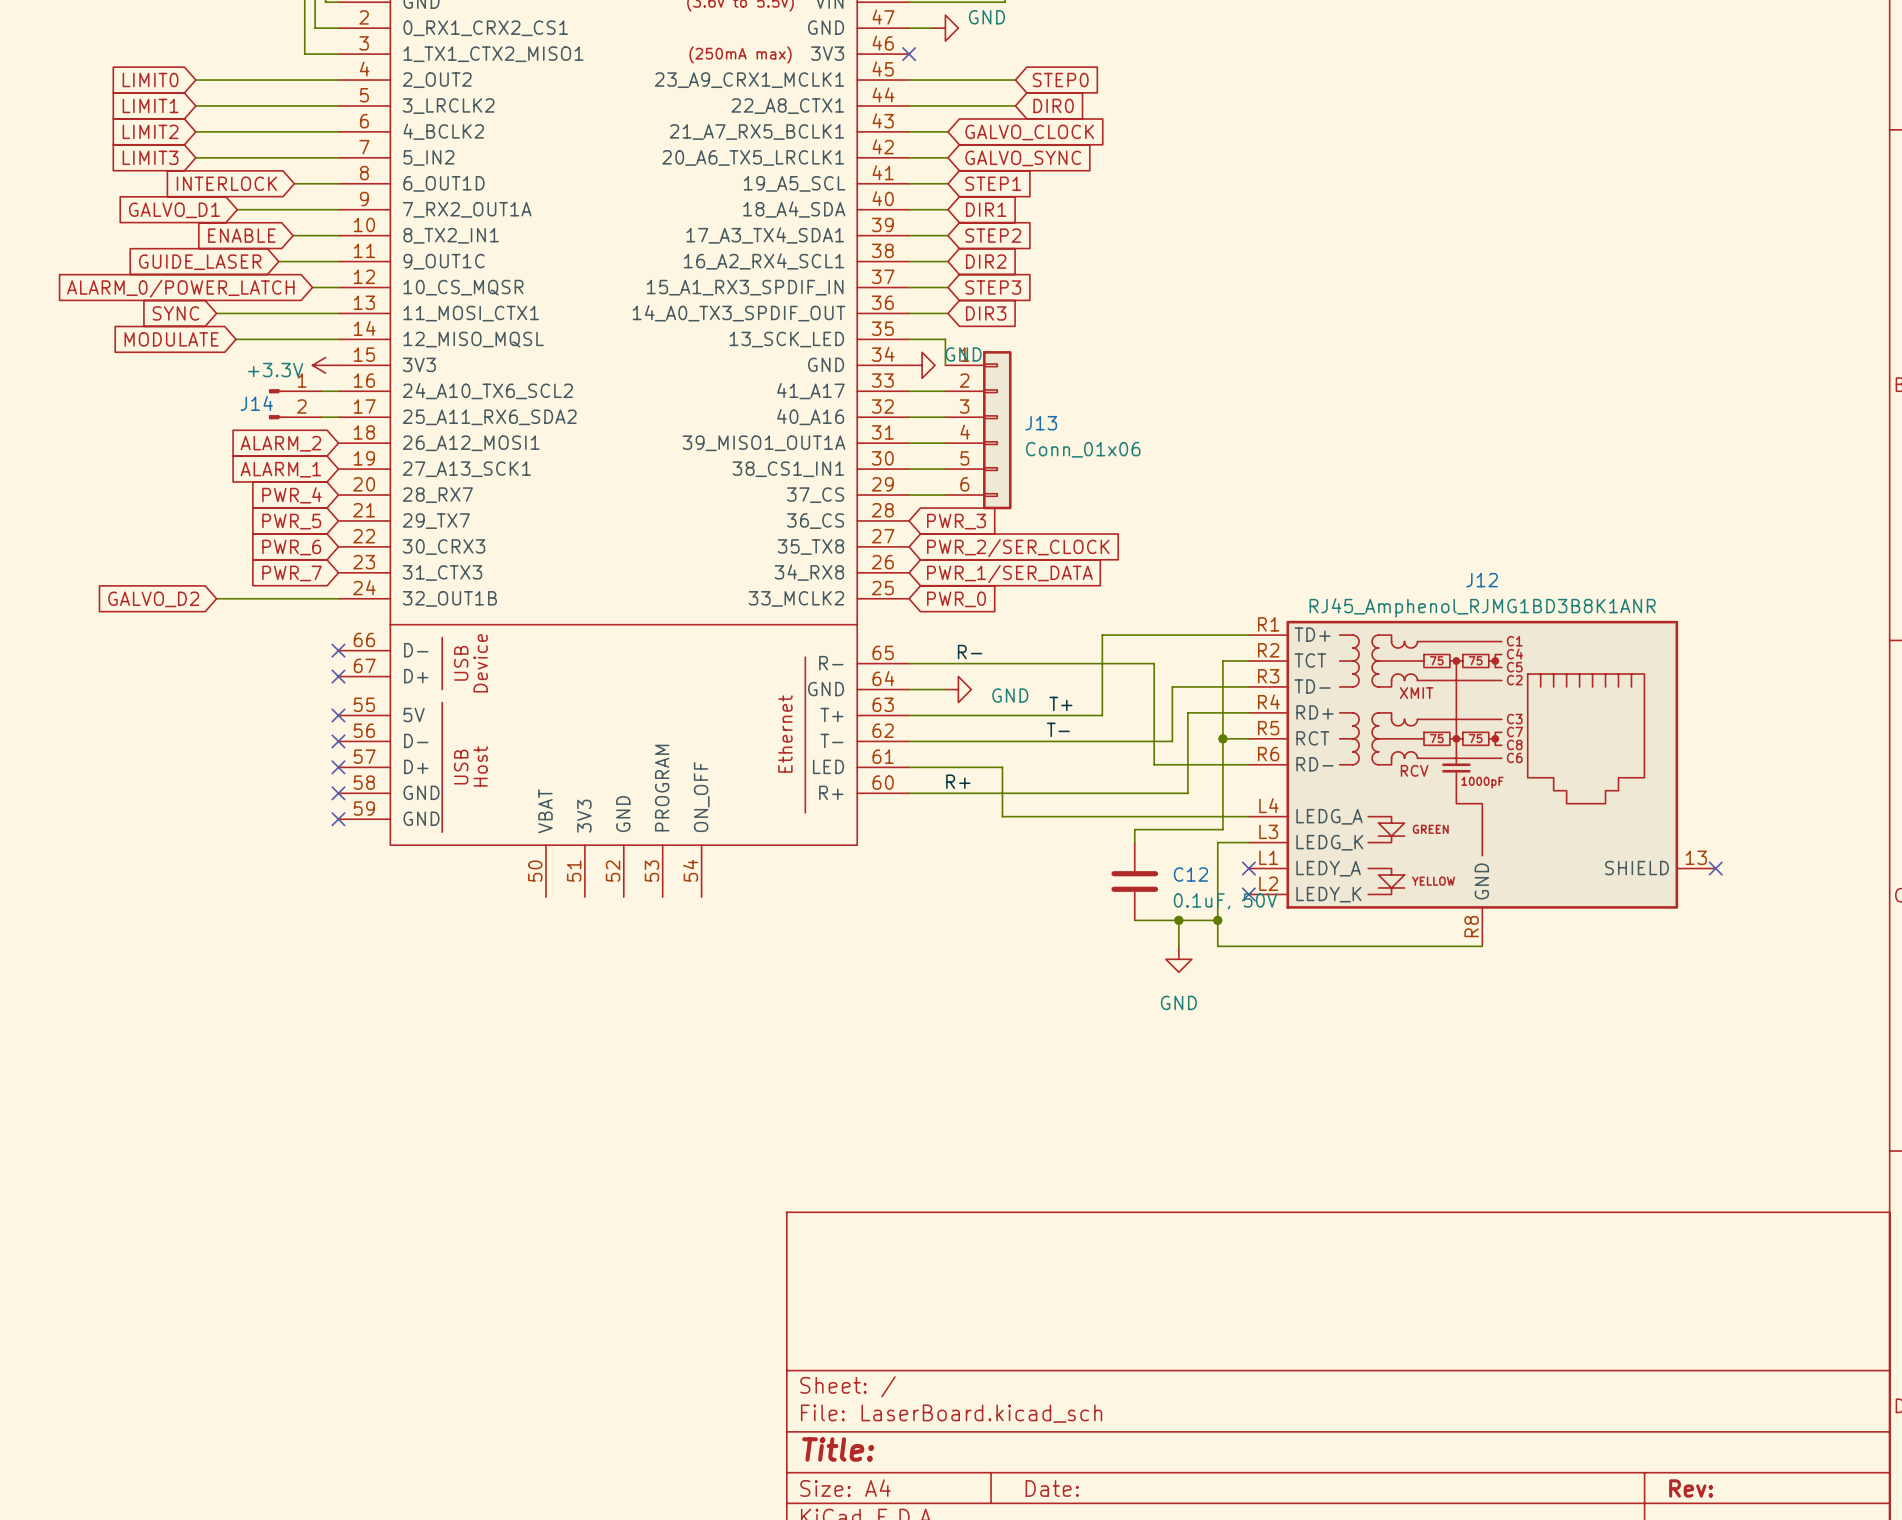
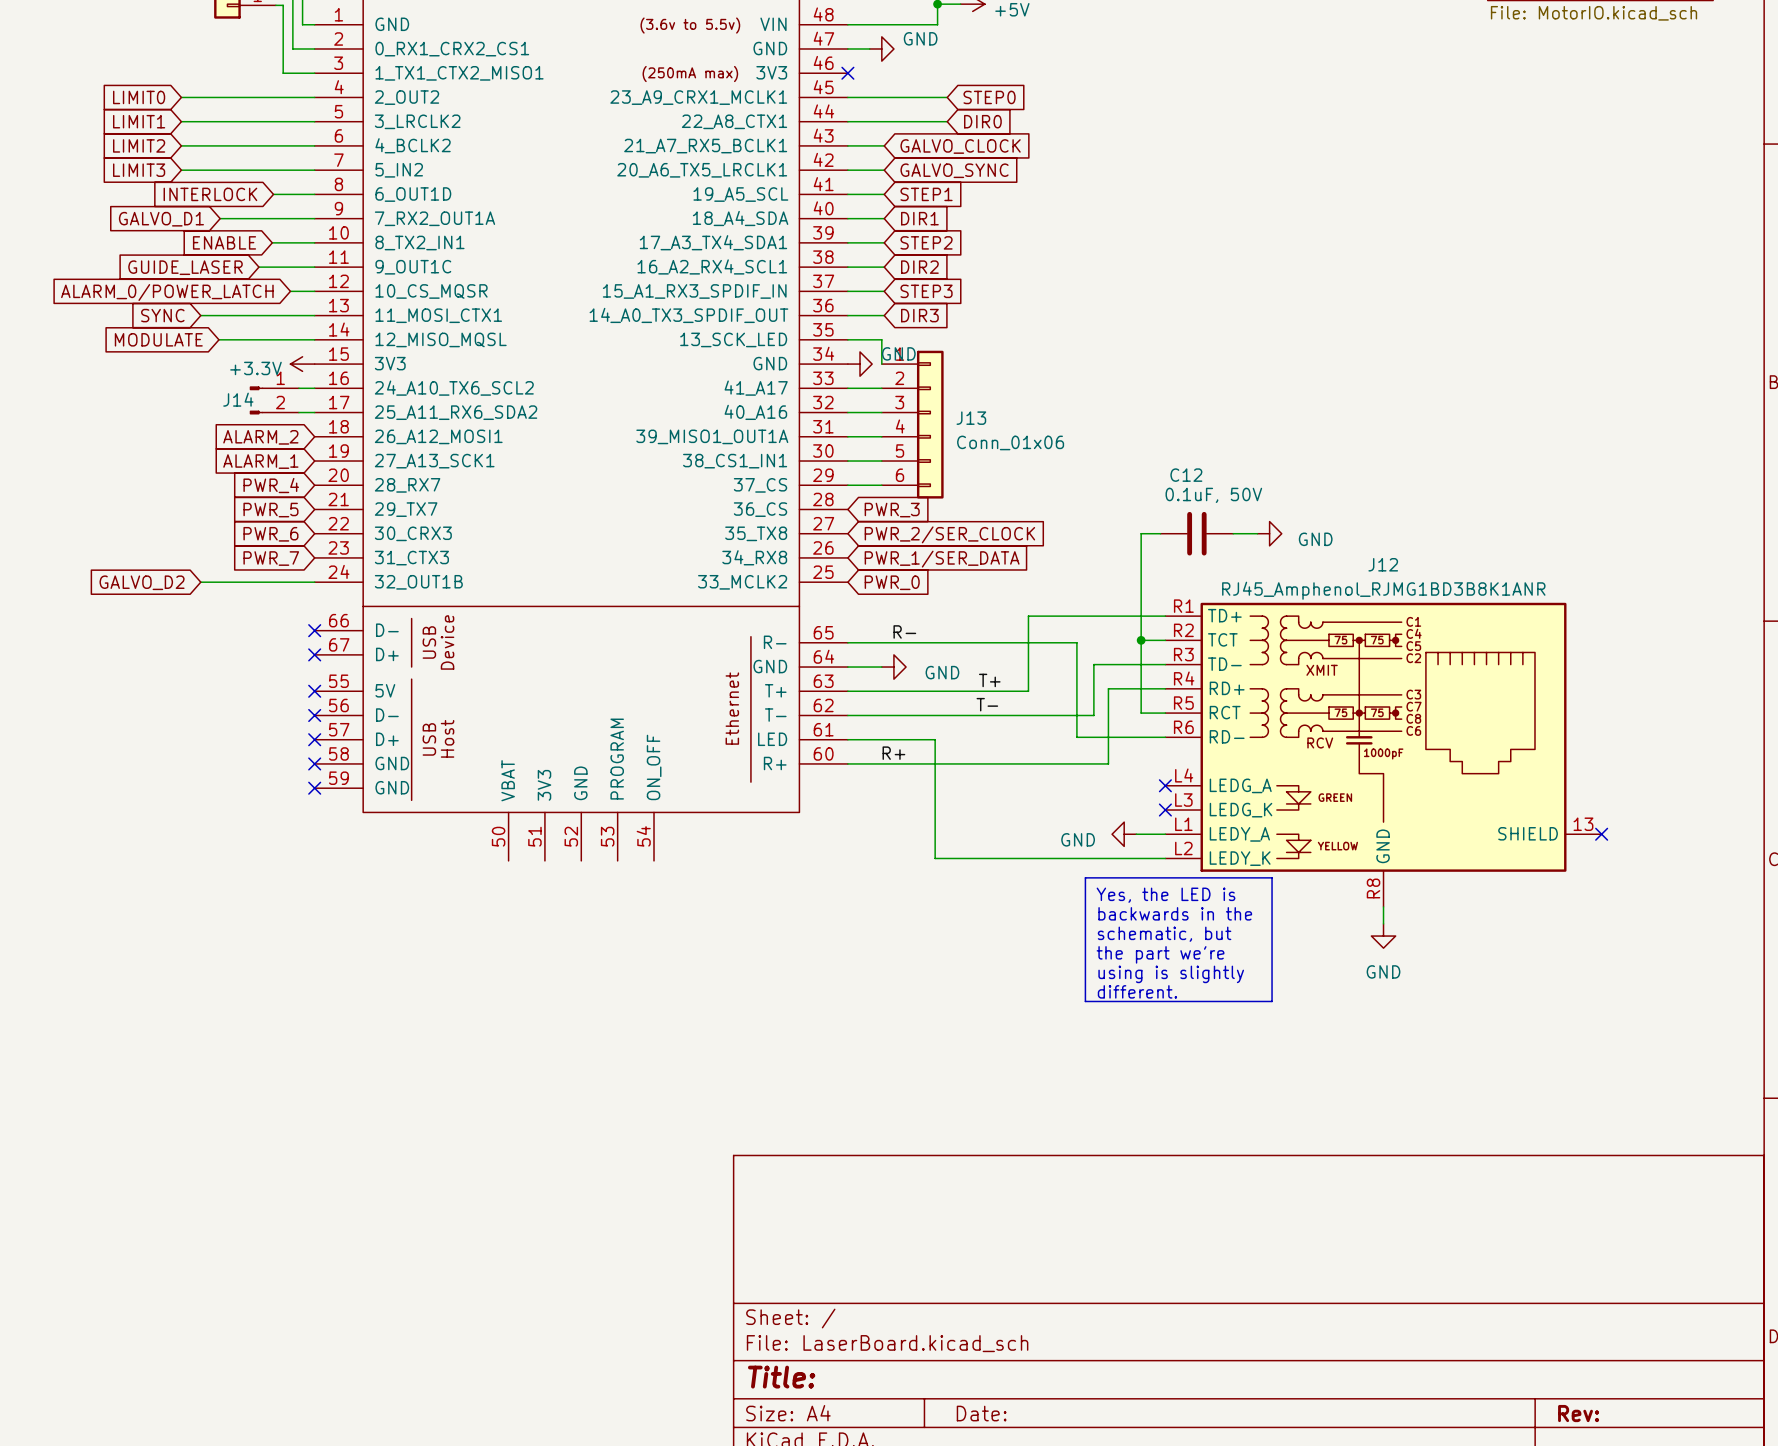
wire: none -> (1160, 533) (1141, 533) (1141, 640)
wire: none -> (1233, 533) (1257, 533)
power symbol: none -> GND (1269, 533)
junction: none -> (1141, 640)
wire: (1222, 738) (1222, 829) (1134, 829) (1134, 842) -> none
junction: (1222, 738) -> none
wire: (1002, 816) (1248, 816) -> (935, 785) (935, 858) (1165, 858)
no-connect mark: none -> (1165, 785)
wire: (1248, 842) (1217, 842) (1217, 946) (1482, 946) -> (1383, 923) (1383, 906)
no-connect mark: none -> (1165, 810)
wire: none -> (1136, 834) (1165, 834)
no-connect mark: (1248, 868) -> none
C12 name position: C12 (1190, 874) -> C12 (1186, 475)
C12 rotation: 0° (1134, 881) -> 90° clockwise (1196, 533)
C12 position: (1134, 881) -> (1196, 533)
no-connect mark: (1248, 894) -> none
C12 value position: 0.1uF, 50V (1225, 901) -> 0.1uF, 50V (1213, 495)
line: none -> (1085, 877) (1272, 877) (1272, 1001) (1085, 1001) (1085, 877)
wire: (1134, 920) (1217, 920) -> none
wire: (1178, 920) (1178, 946) -> none
junction: (1178, 920) -> none
junction: (1217, 920) -> none
text: none -> Yes, the LED is (1166, 895)
text: none -> backwards in the (1175, 913)
power symbol rotation: 0° (1178, 959) -> 90° clockwise (1124, 834)
power symbol position: GND (1178, 959) -> GND (1124, 834)
text: none -> schematic, but (1164, 934)
power symbol: none -> GND (1383, 936)
text: none -> the part we're (1160, 954)
text: none -> using is slightly (1171, 974)
text: none -> different. (1137, 991)

